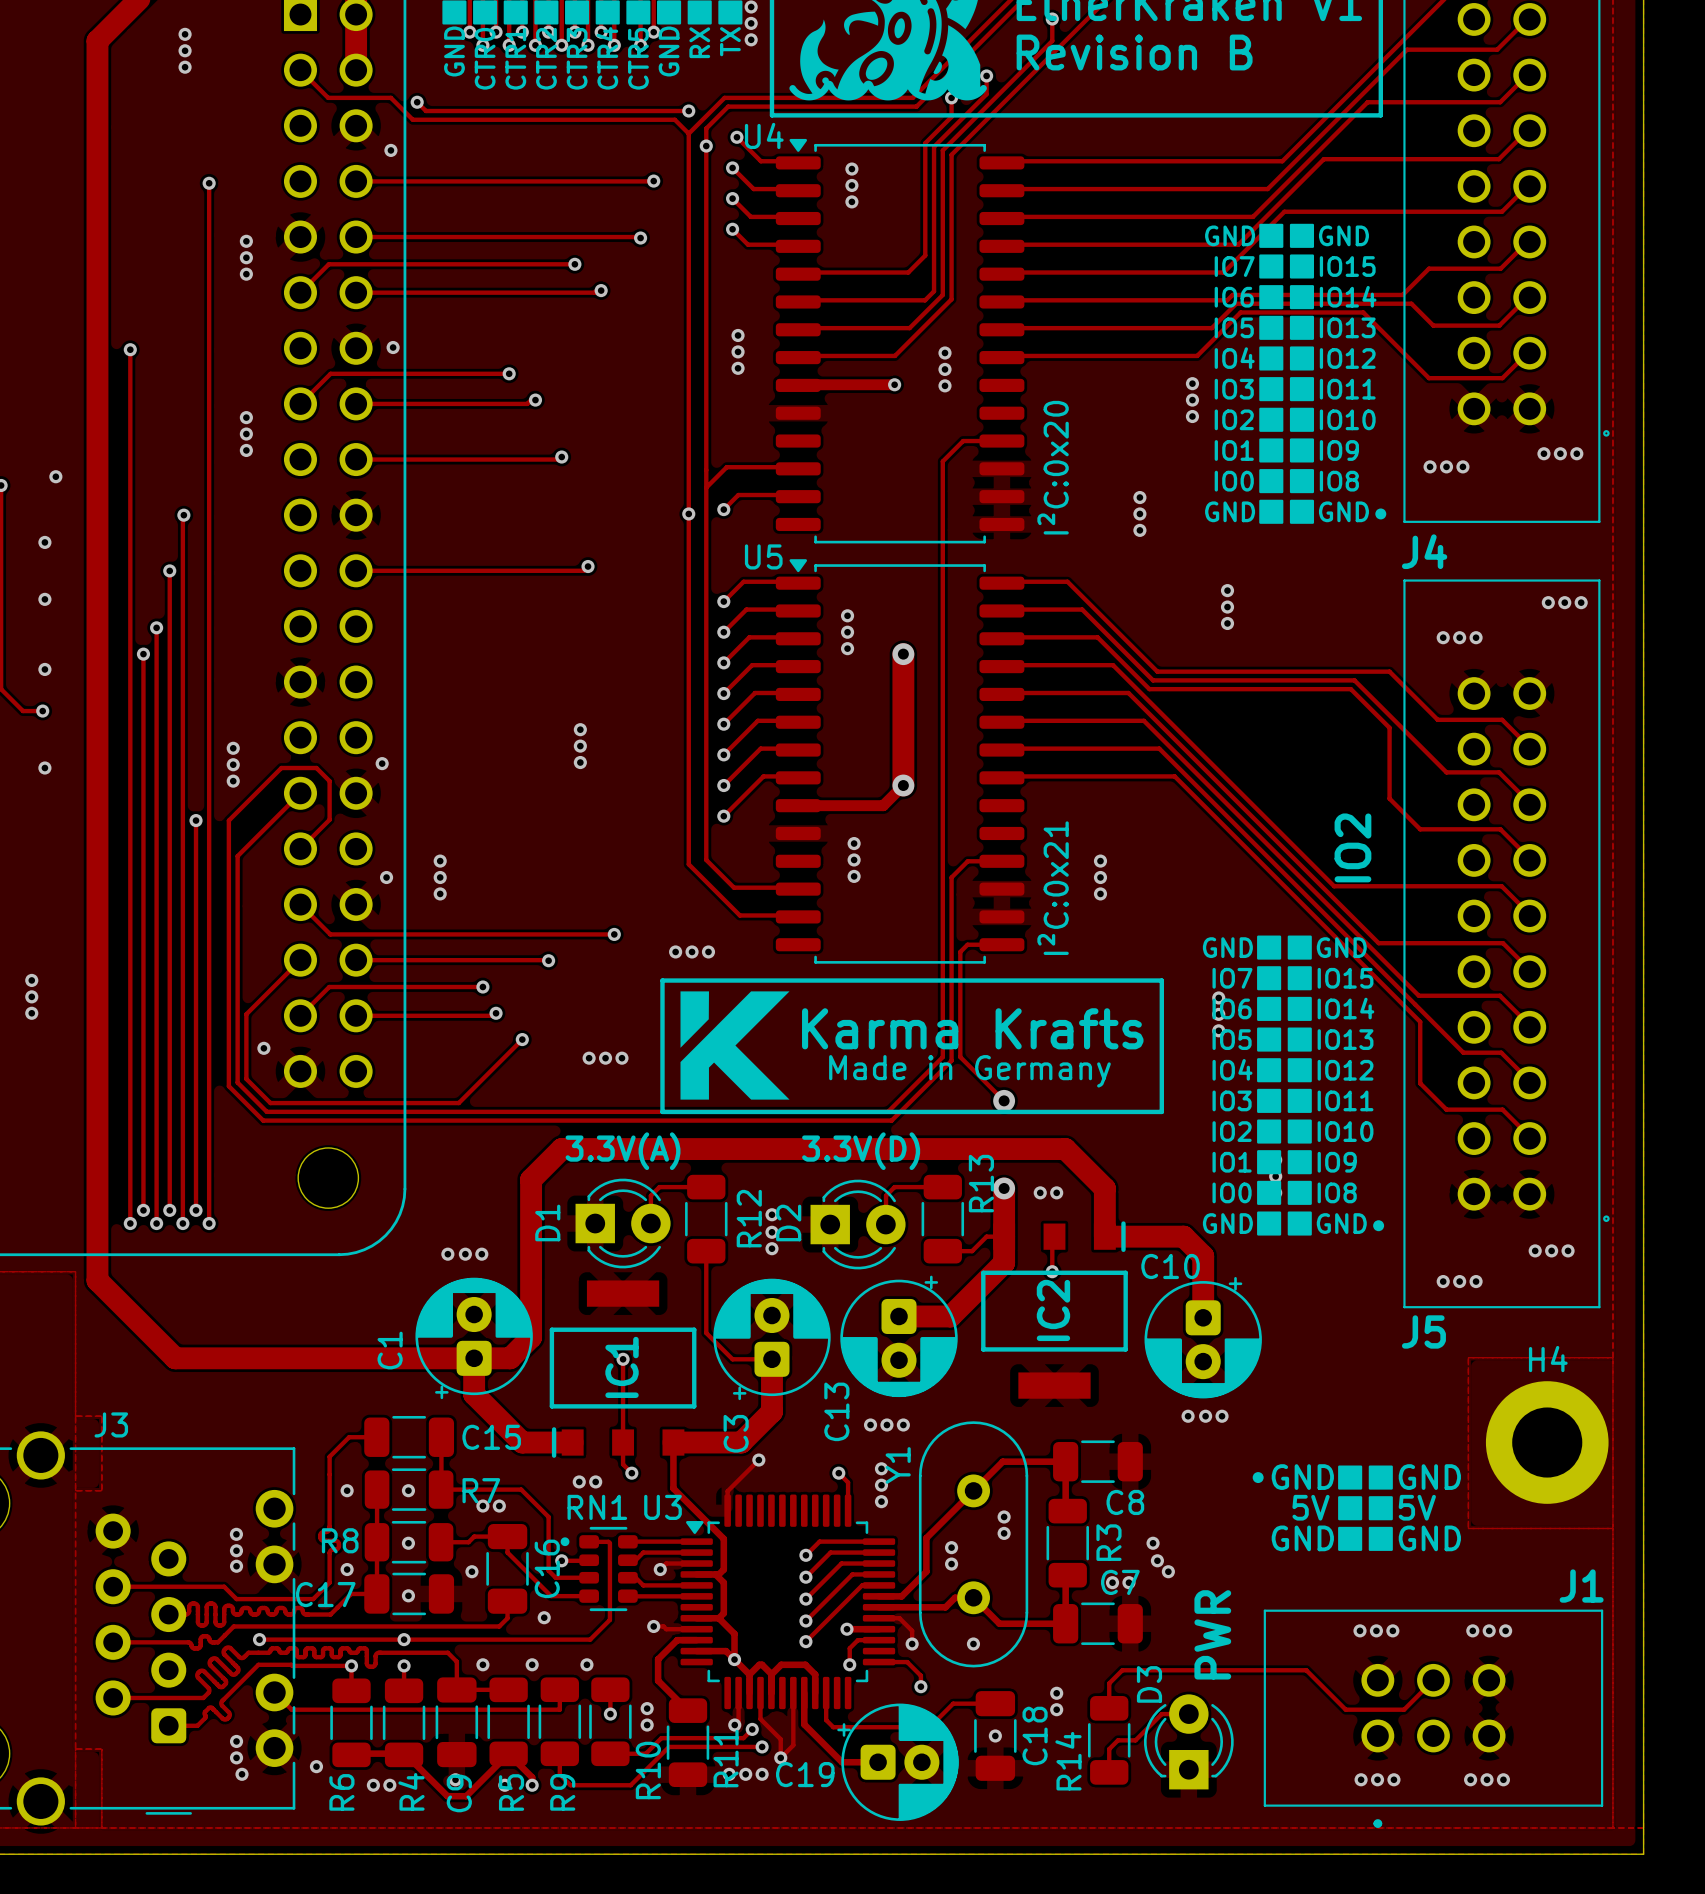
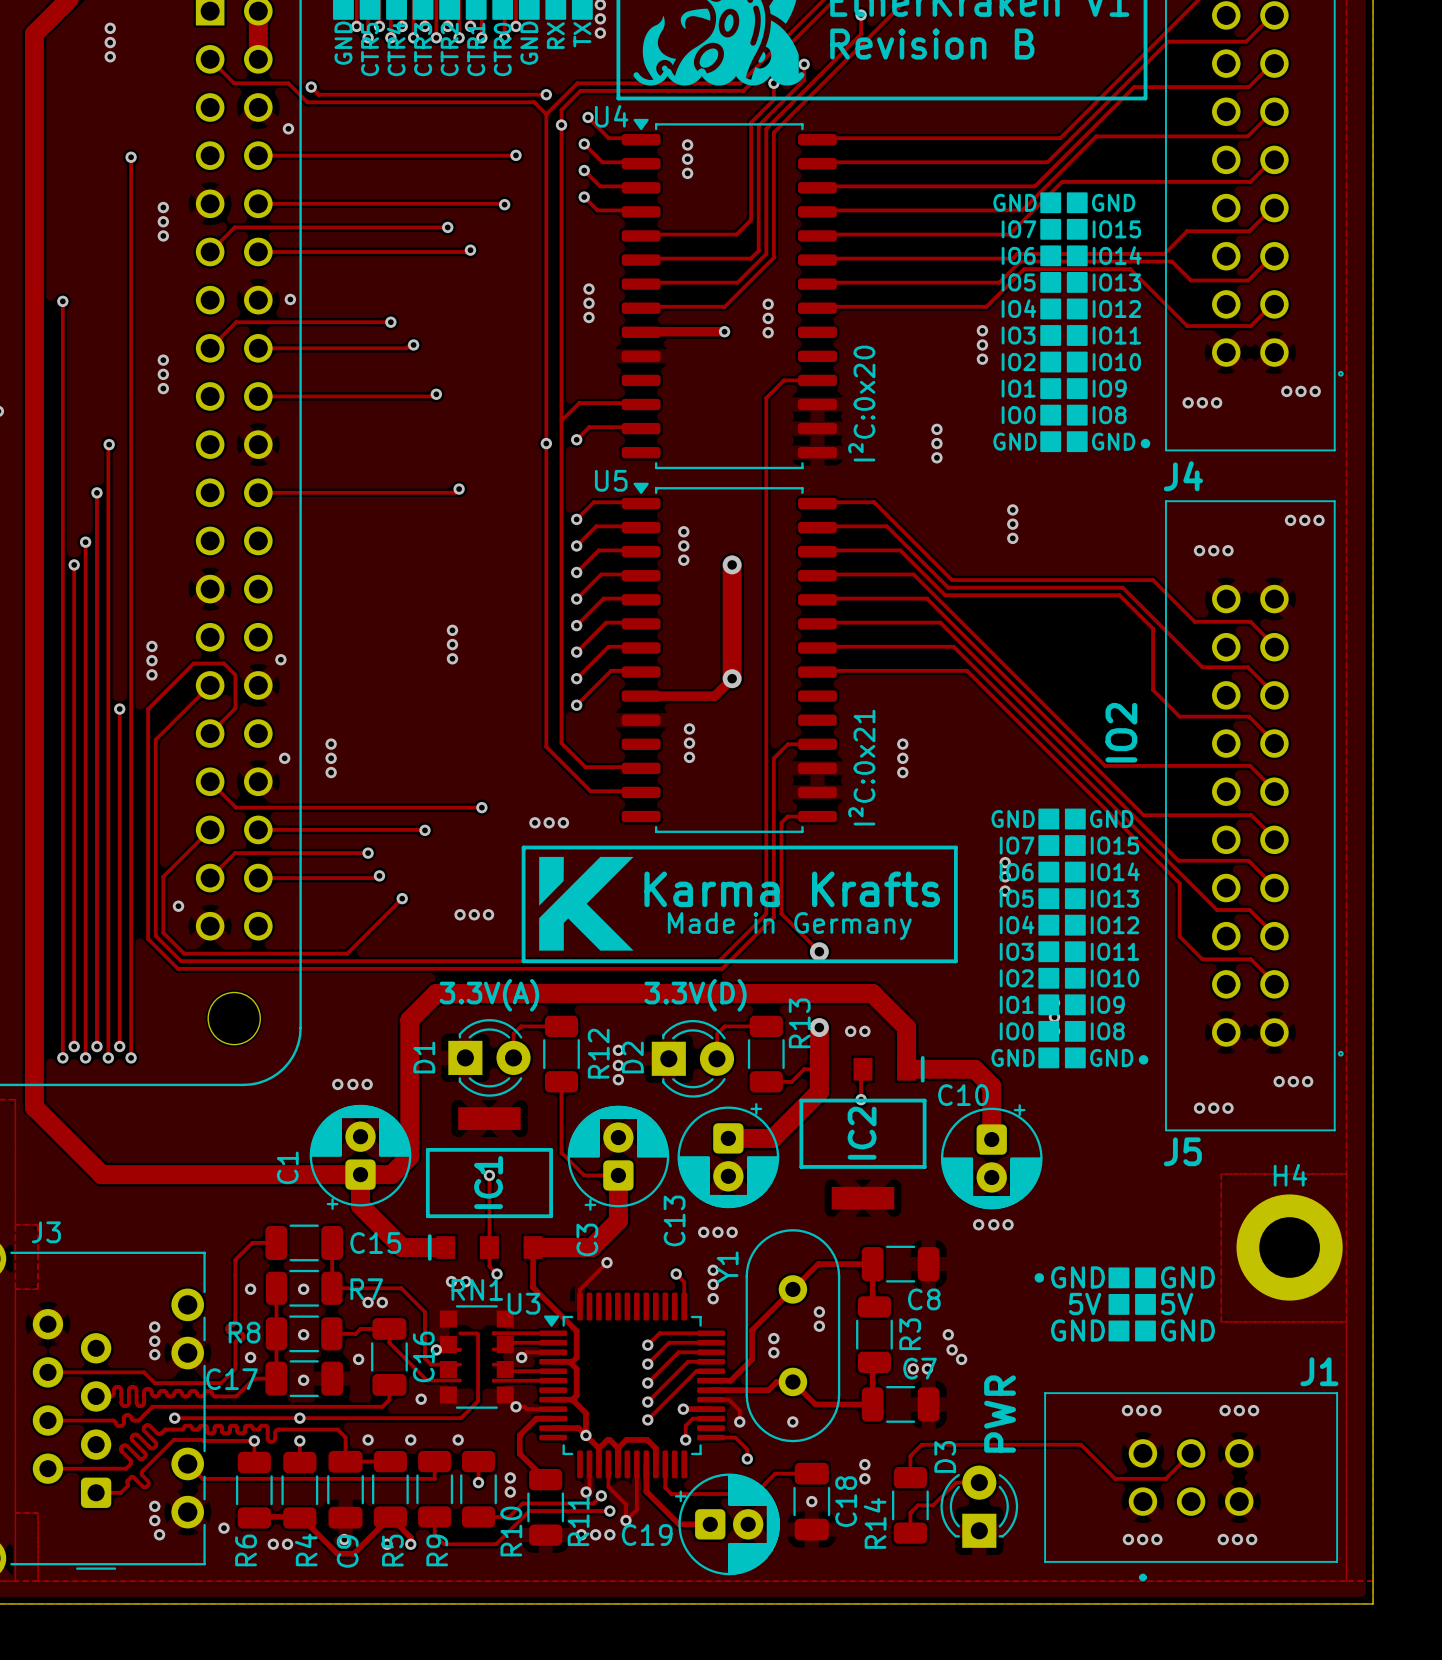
text: CTR0 (485, 58) -> CTR5 (370, 49)
text: CTR1 (515, 58) -> CTR4 (396, 49)
text: CTR2 (546, 58) -> CTR3 (423, 49)
text: CTR3 (577, 58) -> CTR2 (449, 49)
text: CTR4 (607, 58) -> CTR1 (476, 49)
text: CTR5 (638, 58) -> CTR0 (502, 49)
RN1 footprint: [560, 1526, 638, 1612] -> [439, 1305, 514, 1409]

